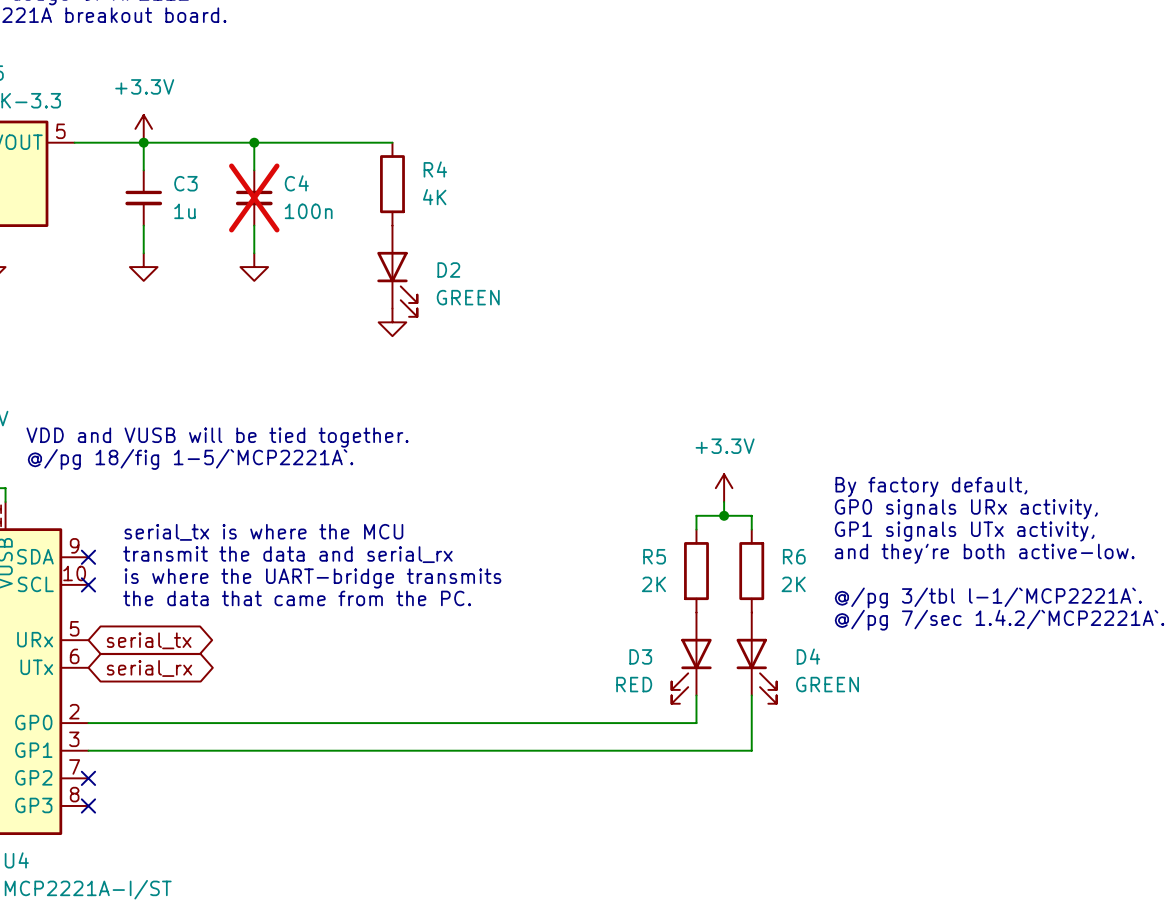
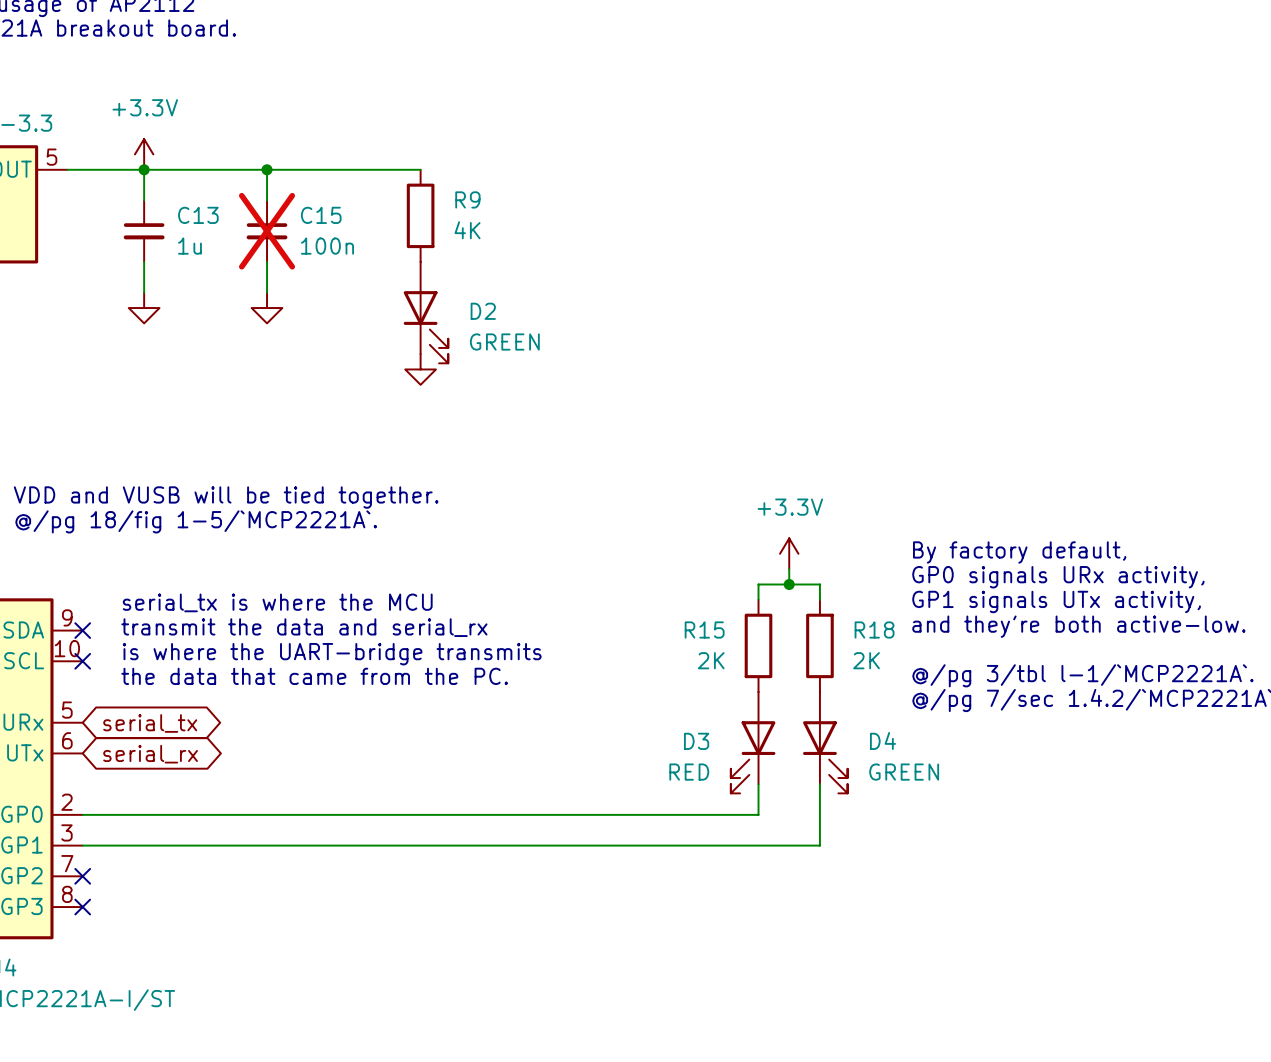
R4 name: R4 (435, 169) -> R9 (467, 199)
C3 name: C3 (185, 183) -> C13 (198, 215)
C4 name: C4 (296, 183) -> C15 (321, 215)
R5 name: R5 (654, 556) -> R15 (704, 629)
R6 name: R6 (794, 556) -> R18 (874, 629)

